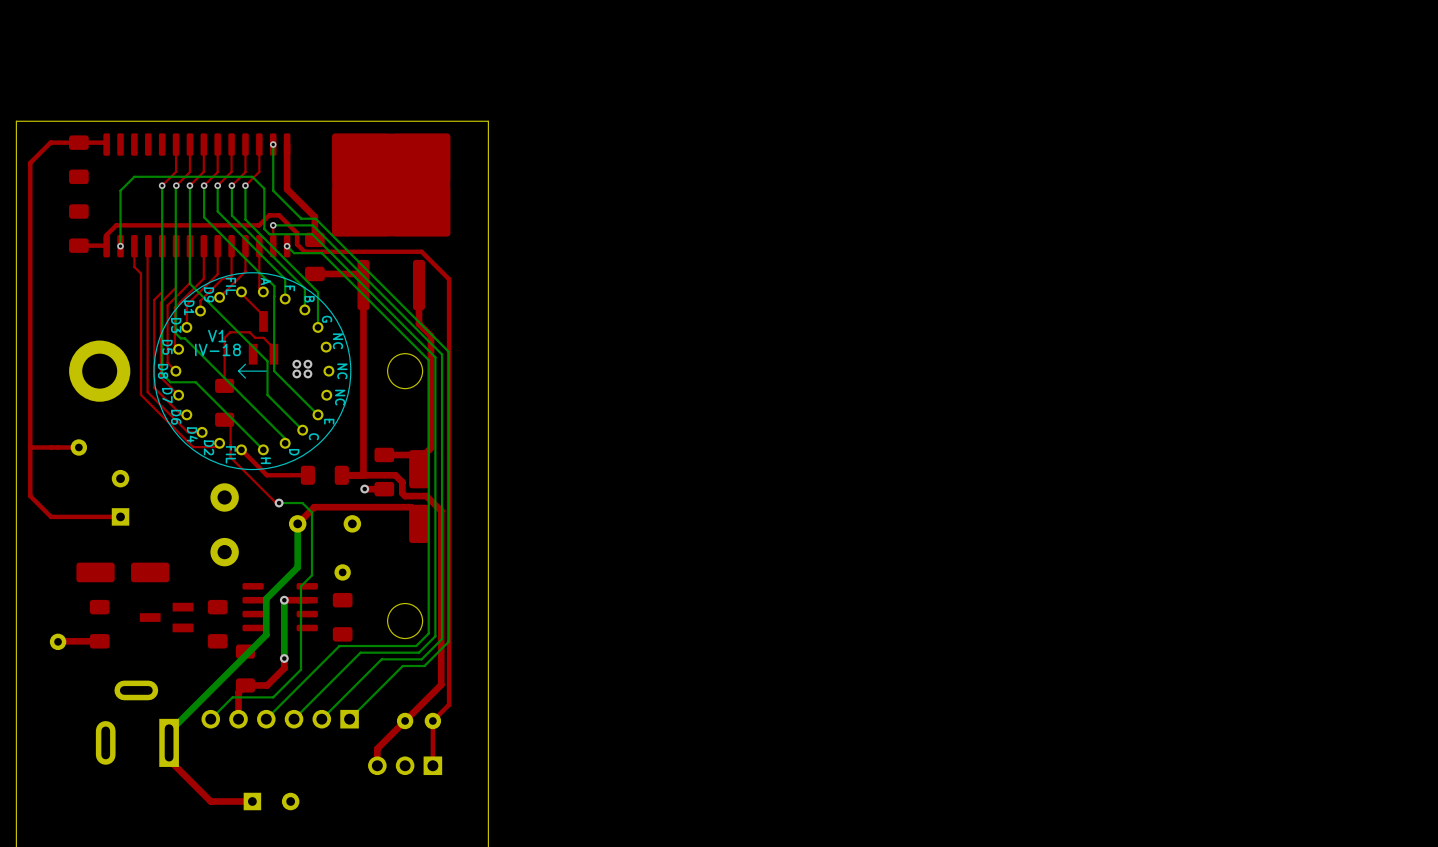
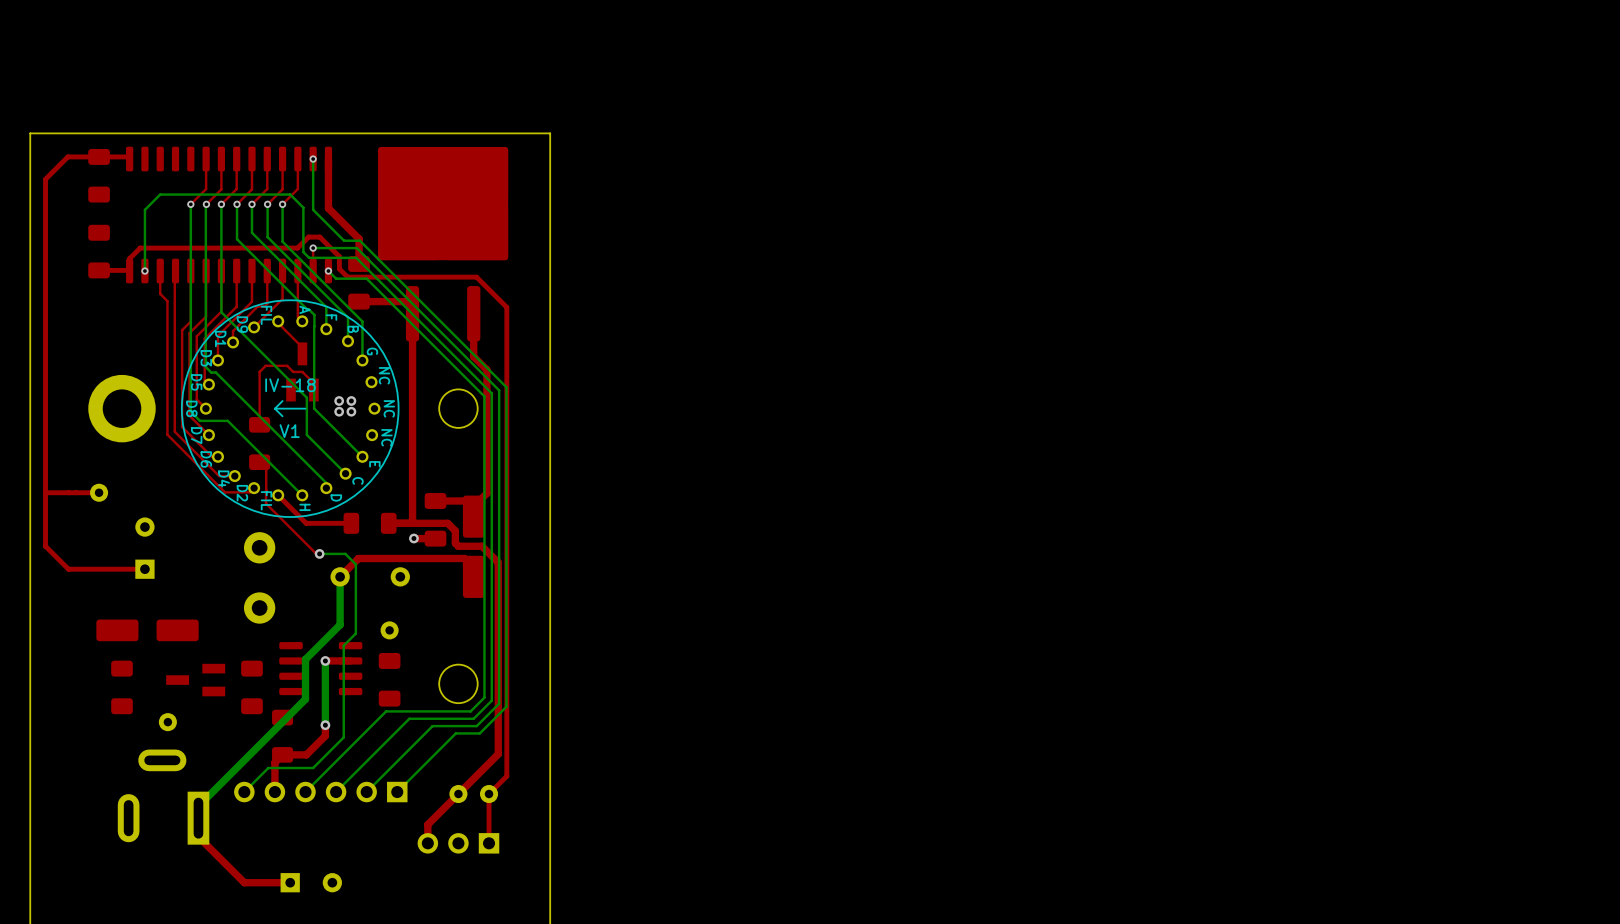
V1 name position: V1 (217, 336) -> V1 (289, 431)
V1 value position: IV-18 (217, 349) -> IV-18 (290, 385)
part position: (58, 641) -> (167, 722)
top track: (99, 641) (58, 641) -> none

